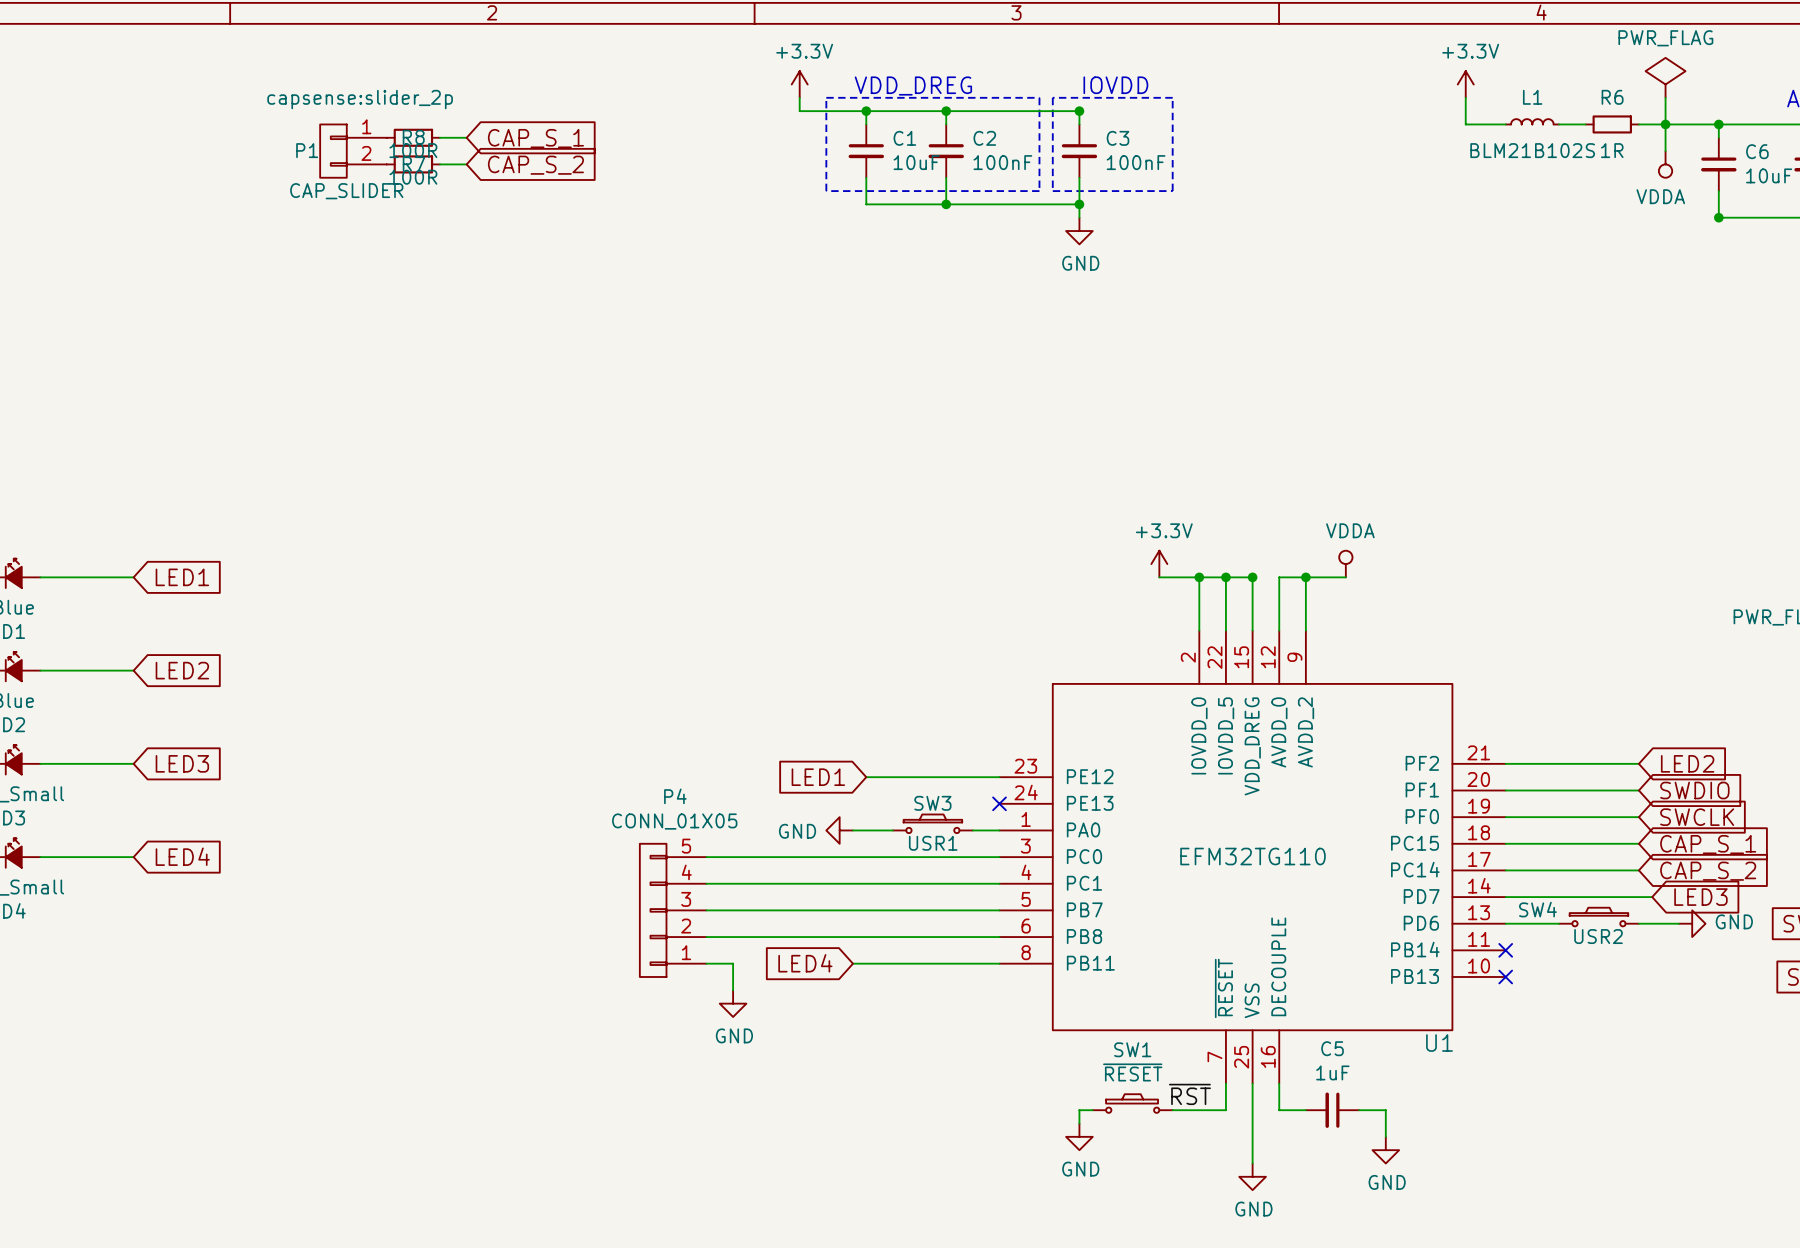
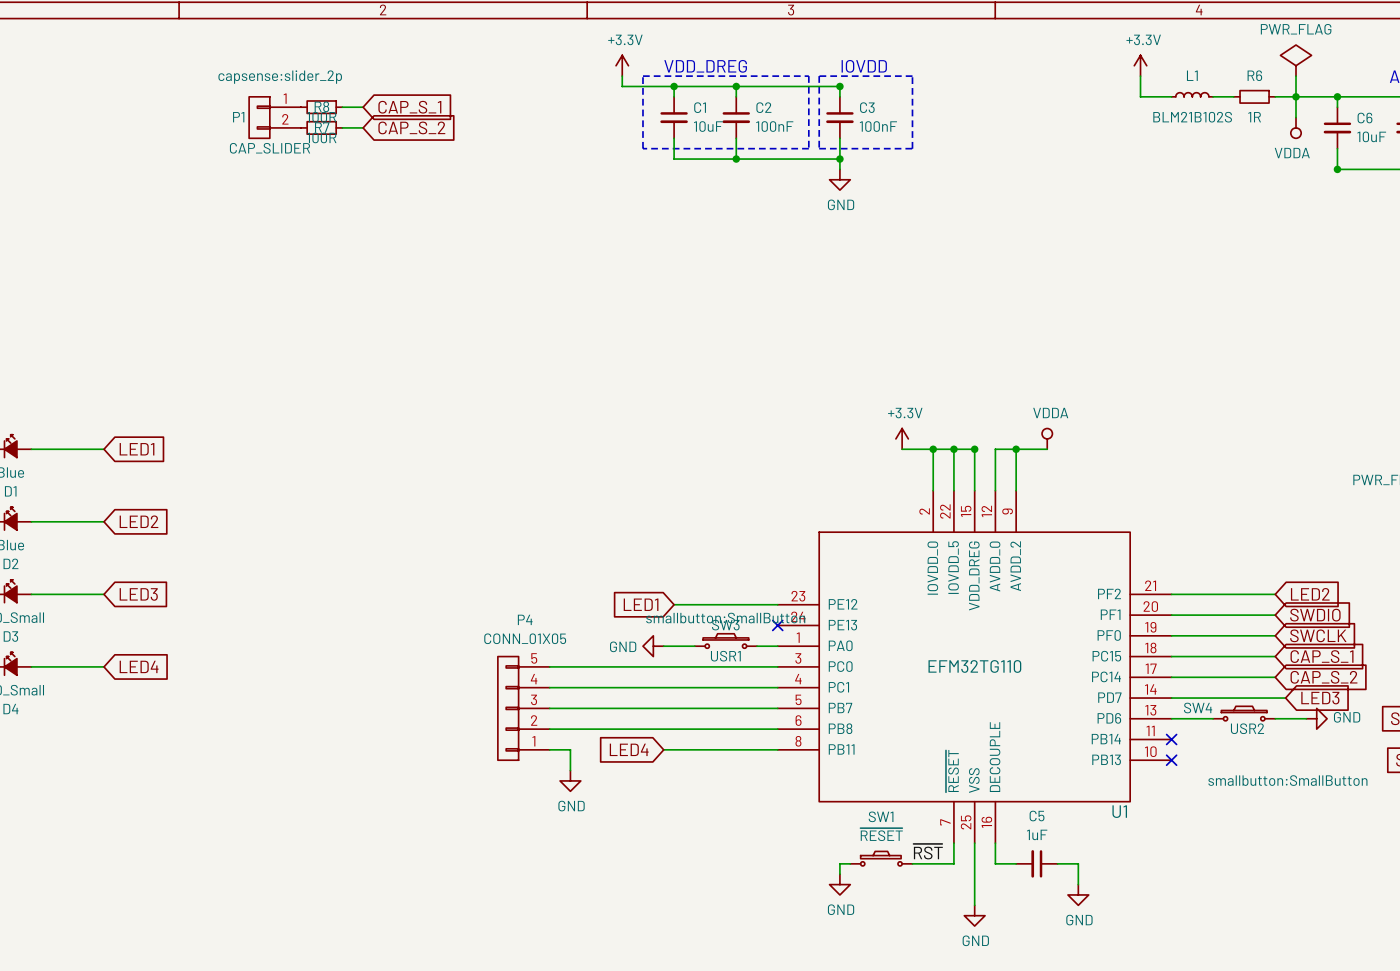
SW3 text: none -> smallbutton:SmallButton (725, 618)
SW4 text: none -> smallbutton:SmallButton (1287, 780)

